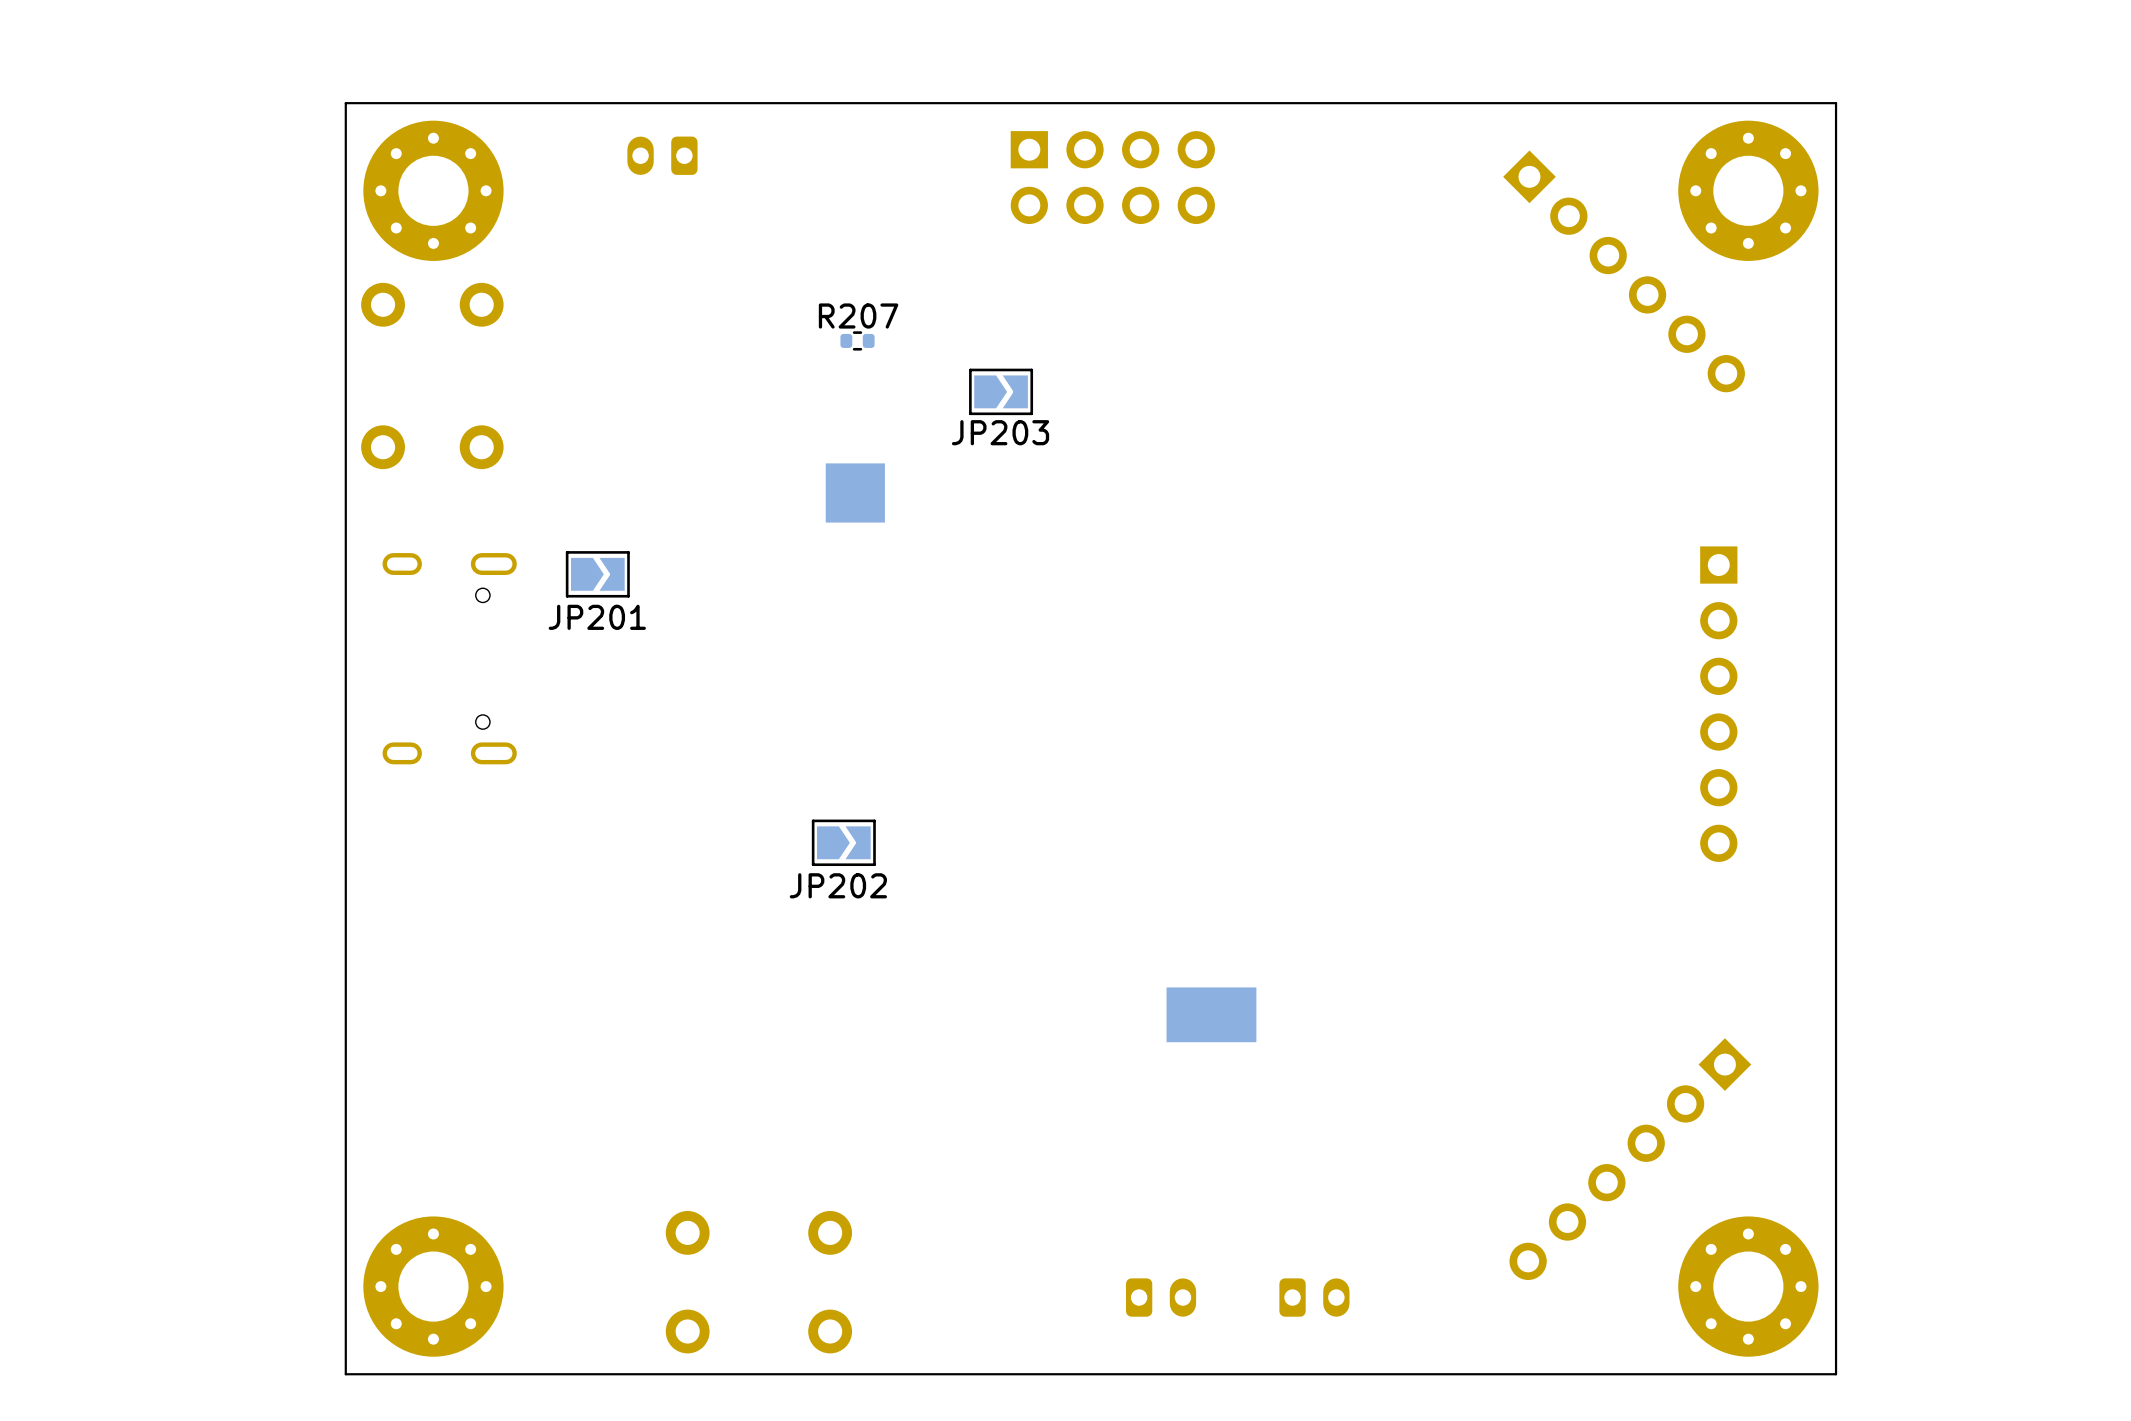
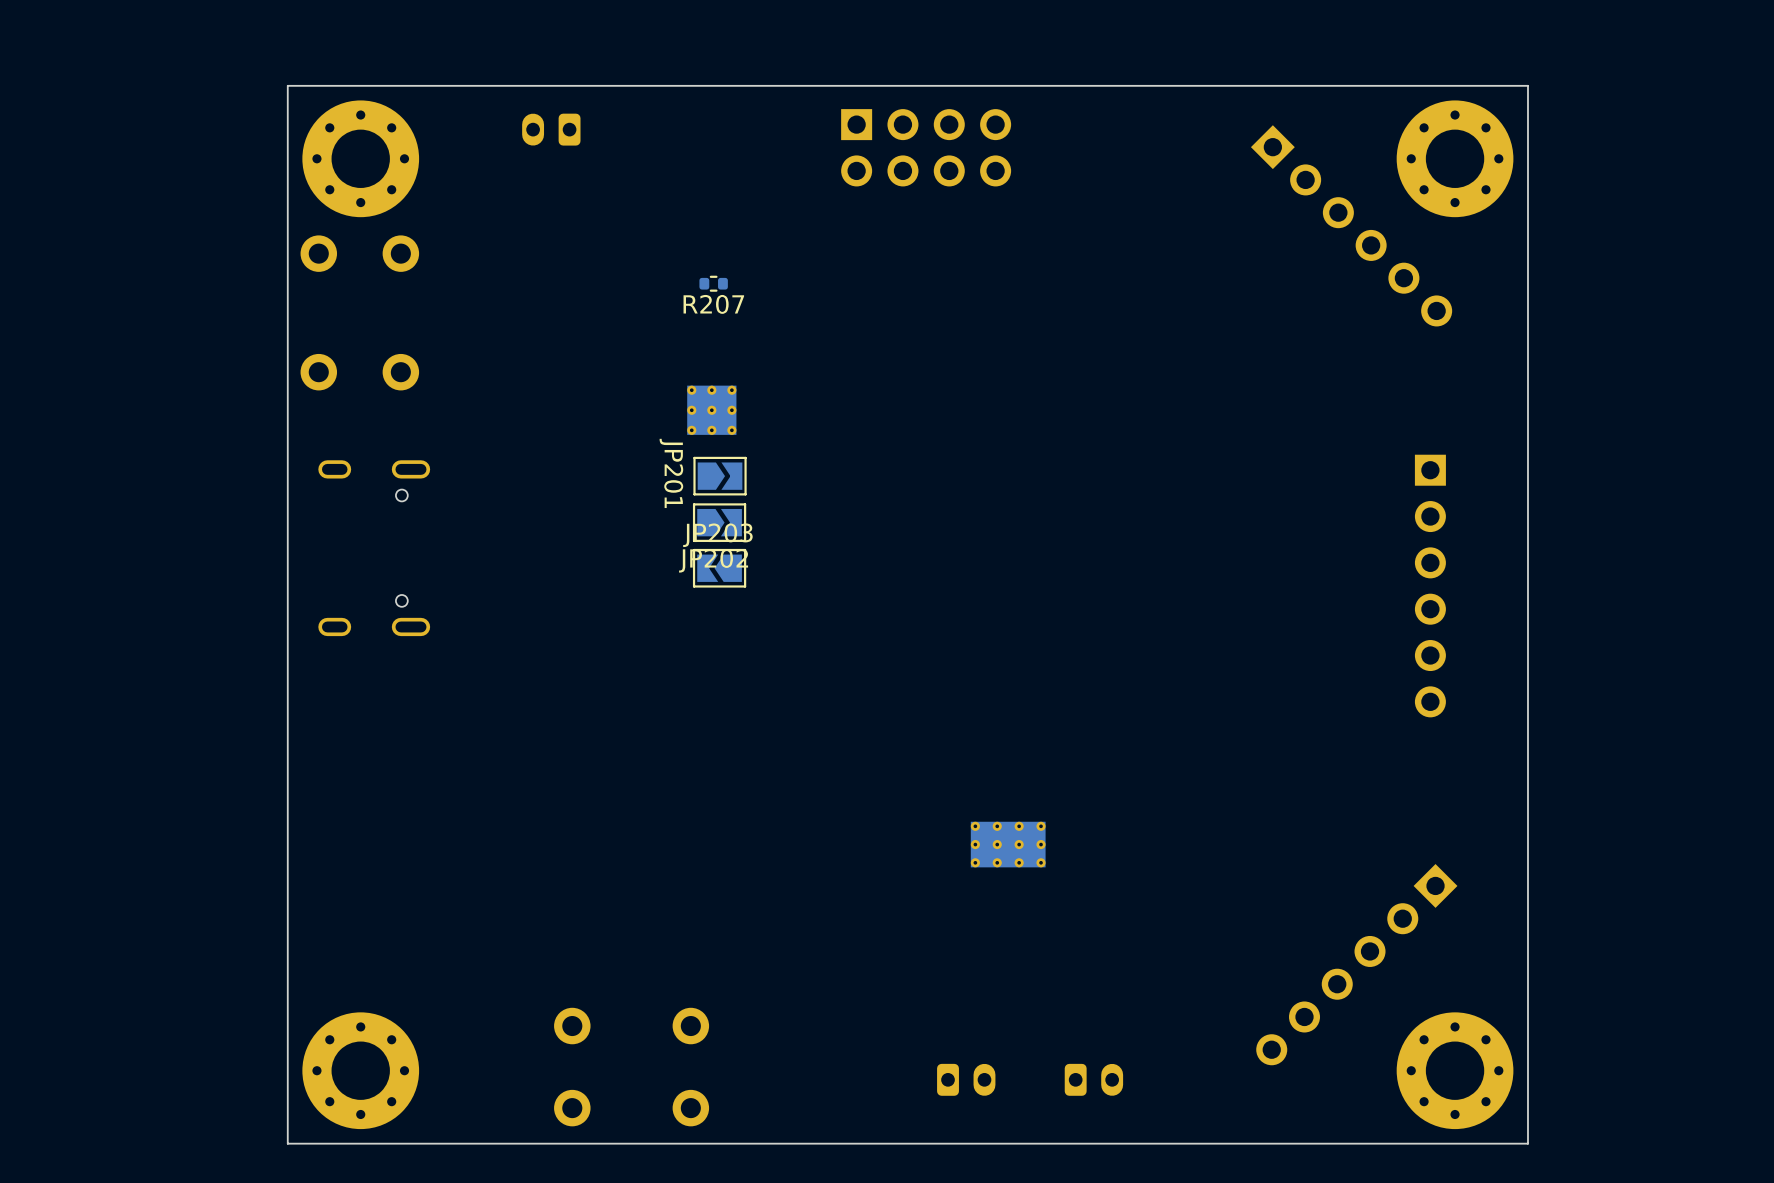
R207 name position: R207 (858, 316) -> R207 (713, 304)
JP203 rotation: 0° (1001, 391) -> 180° (719, 568)
JP203 position: (1001, 391) -> (719, 568)
part footprint: [825, 463, 885, 523] -> [687, 385, 737, 435]
JP201 position: (597, 574) -> (720, 476)
JP201 name rotation: 0° (597, 617) -> 90° clockwise (671, 473)
JP202 position: (843, 842) -> (719, 522)
part footprint: [1166, 987, 1257, 1043] -> [970, 821, 1046, 868]

